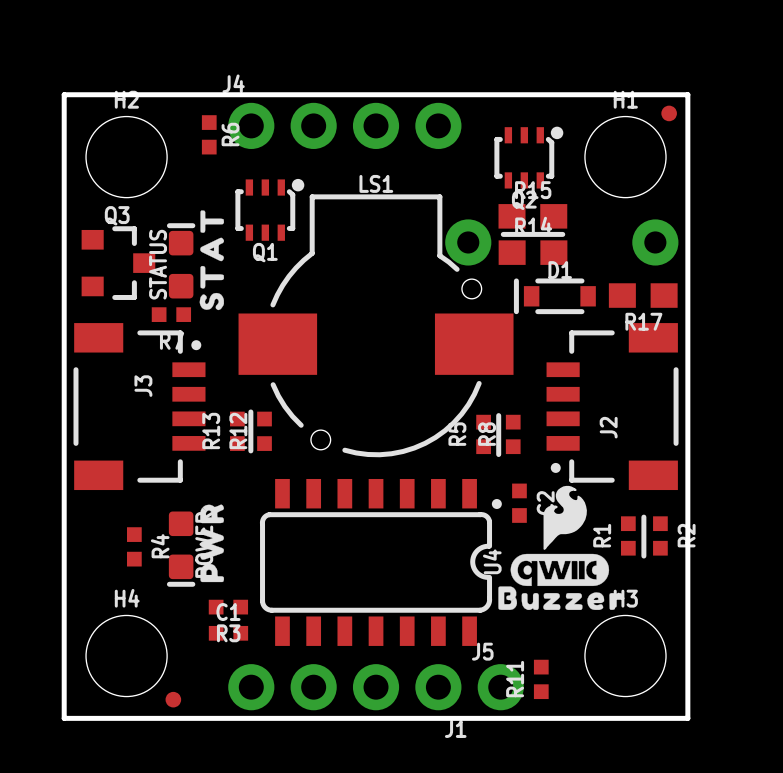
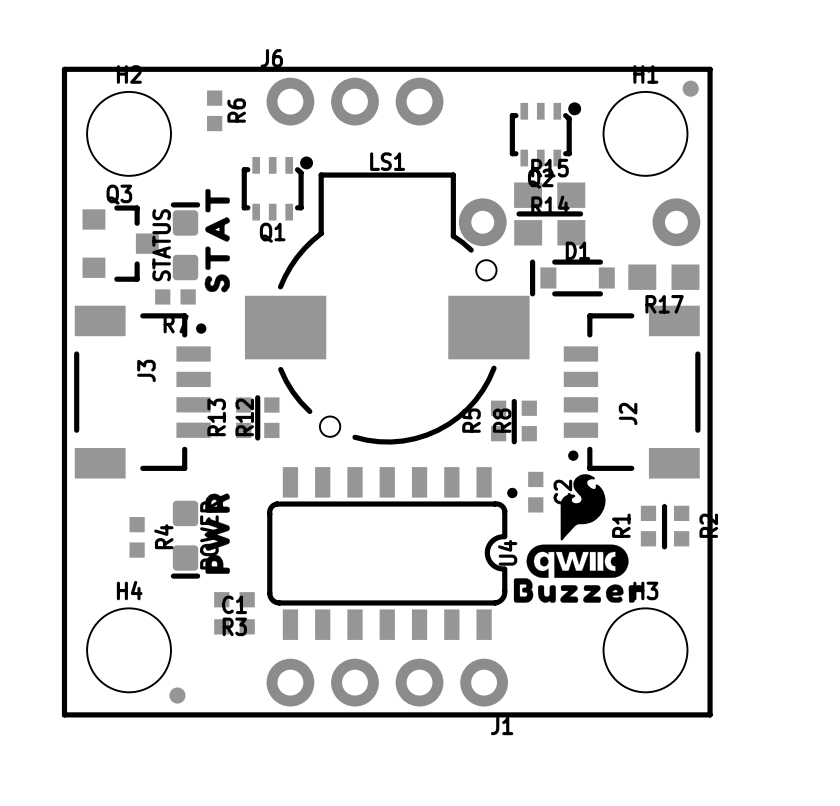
J4: (344, 125) -> none
J6: none -> (354, 101)
R11: (541, 679) -> none
J1 position: (344, 687) -> (387, 682)
J5: (500, 687) -> none

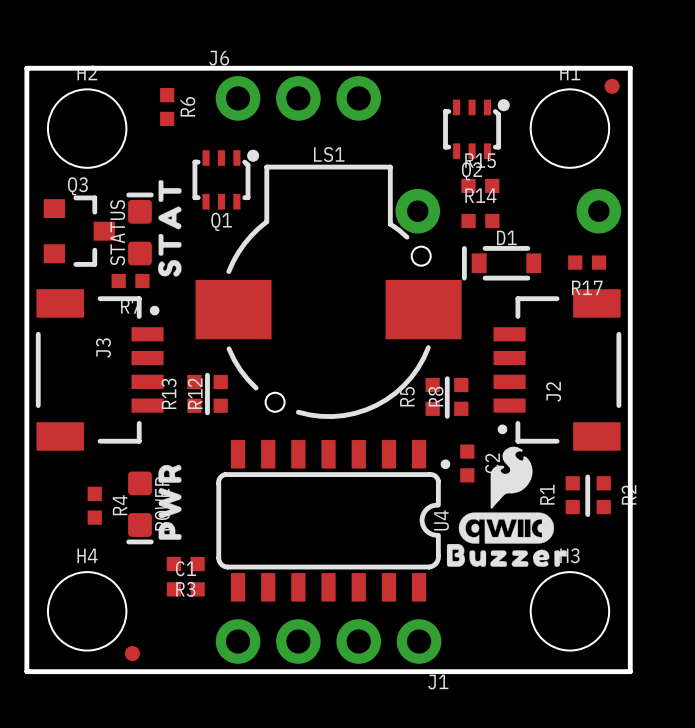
R15 footprint: [514, 182, 586, 208] -> [461, 178, 500, 194]
line: (519, 213) (580, 213) -> none
R14 footprint: [514, 220, 586, 246] -> [461, 213, 500, 229]
R17 footprint: [628, 264, 700, 290] -> [568, 255, 607, 270]

